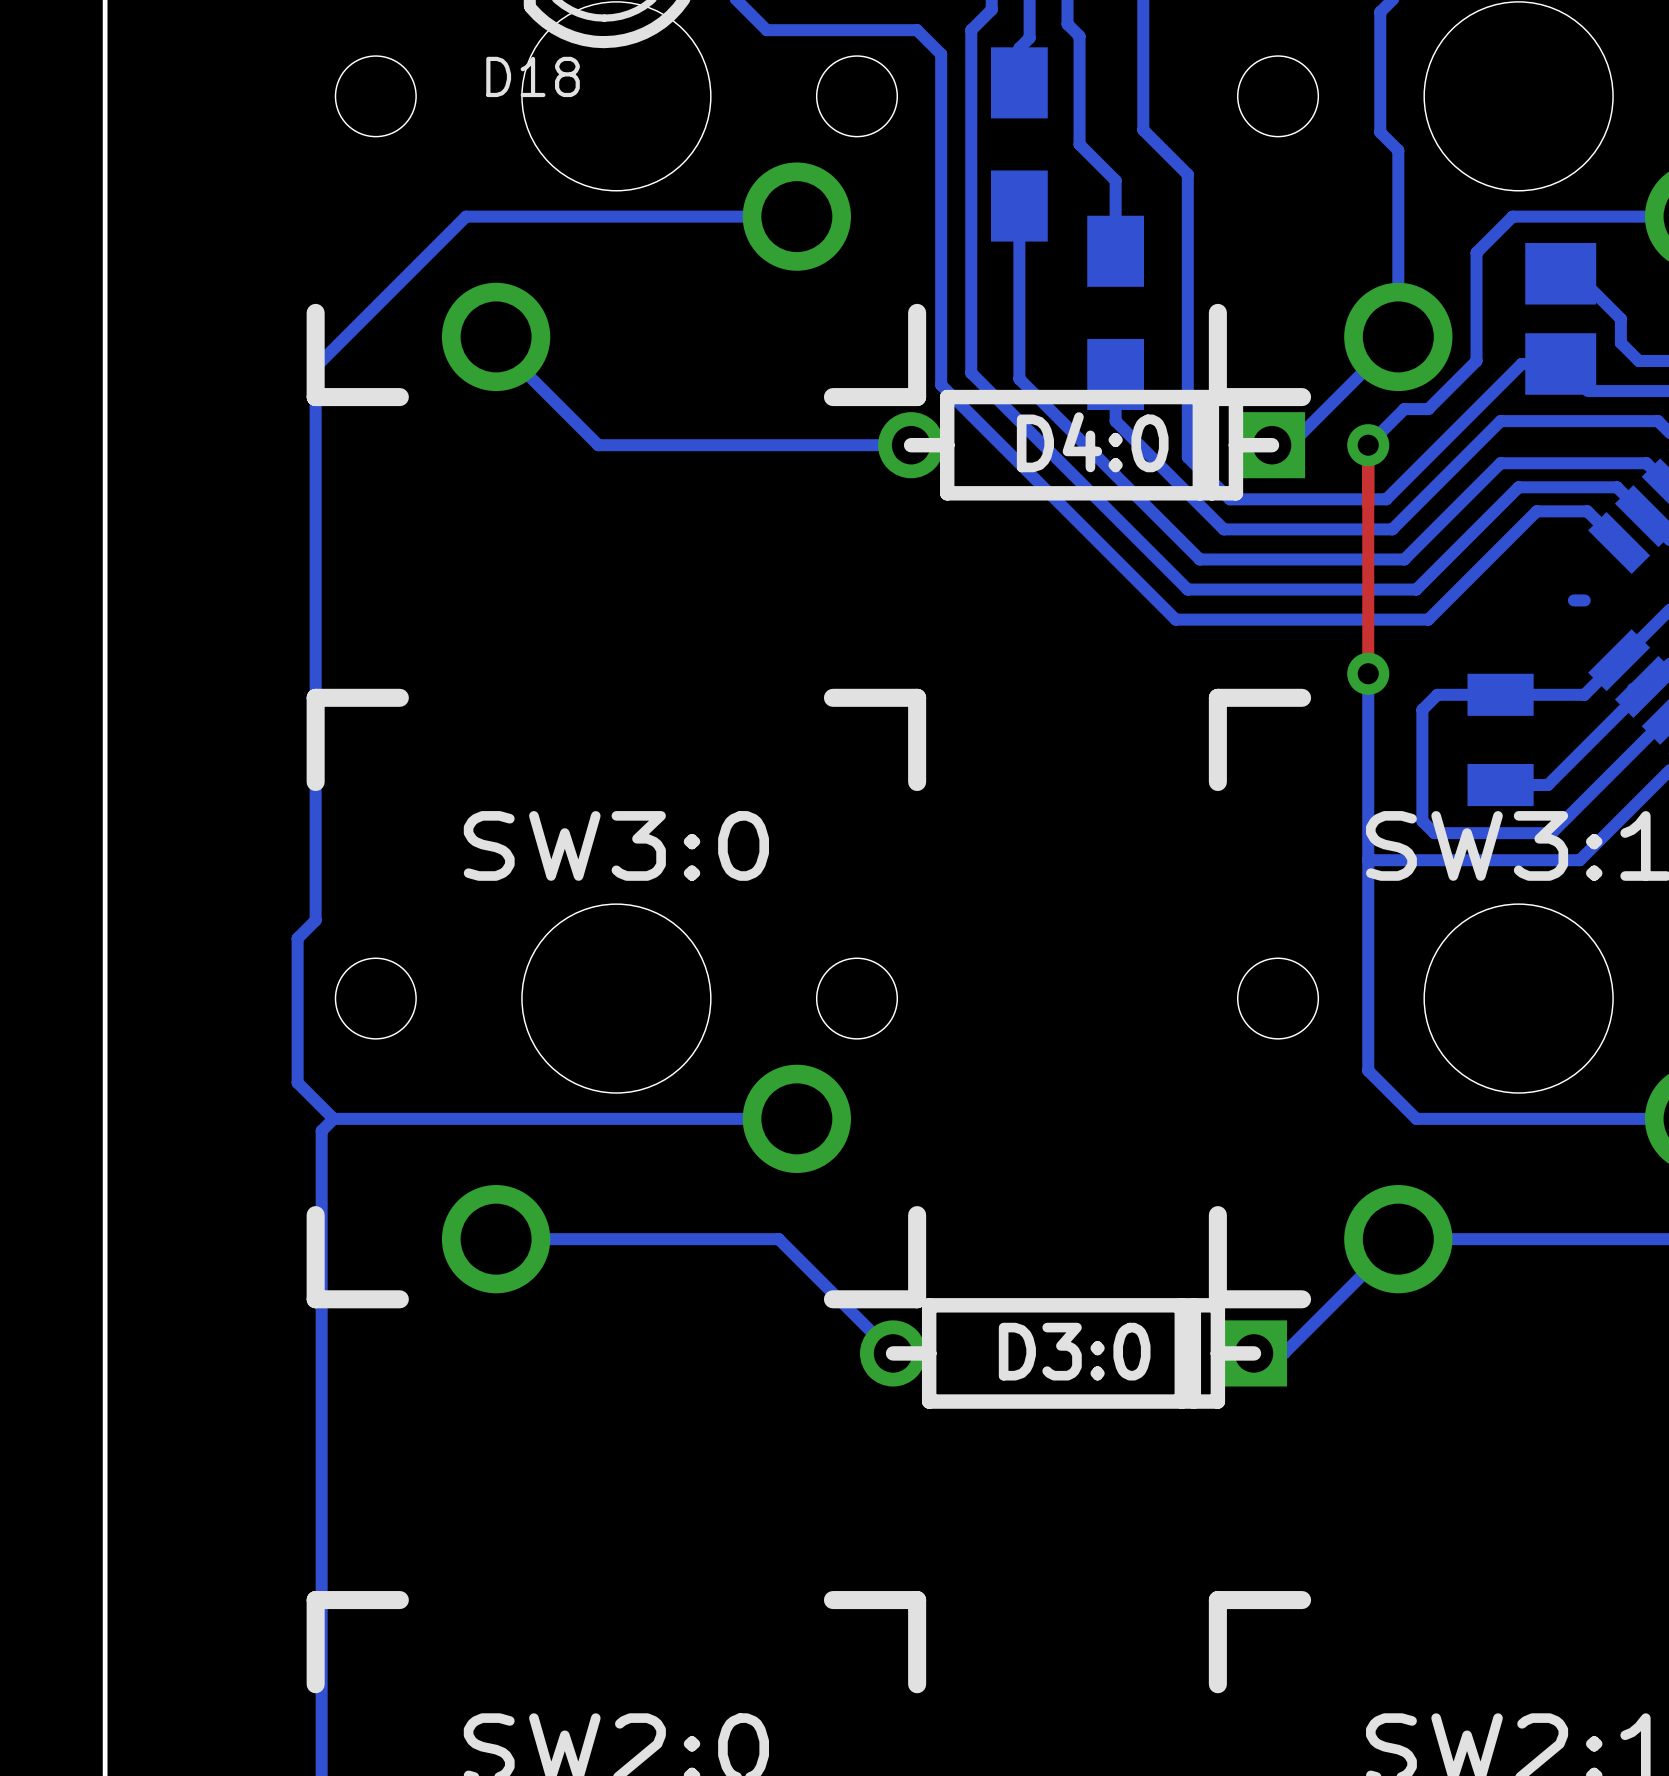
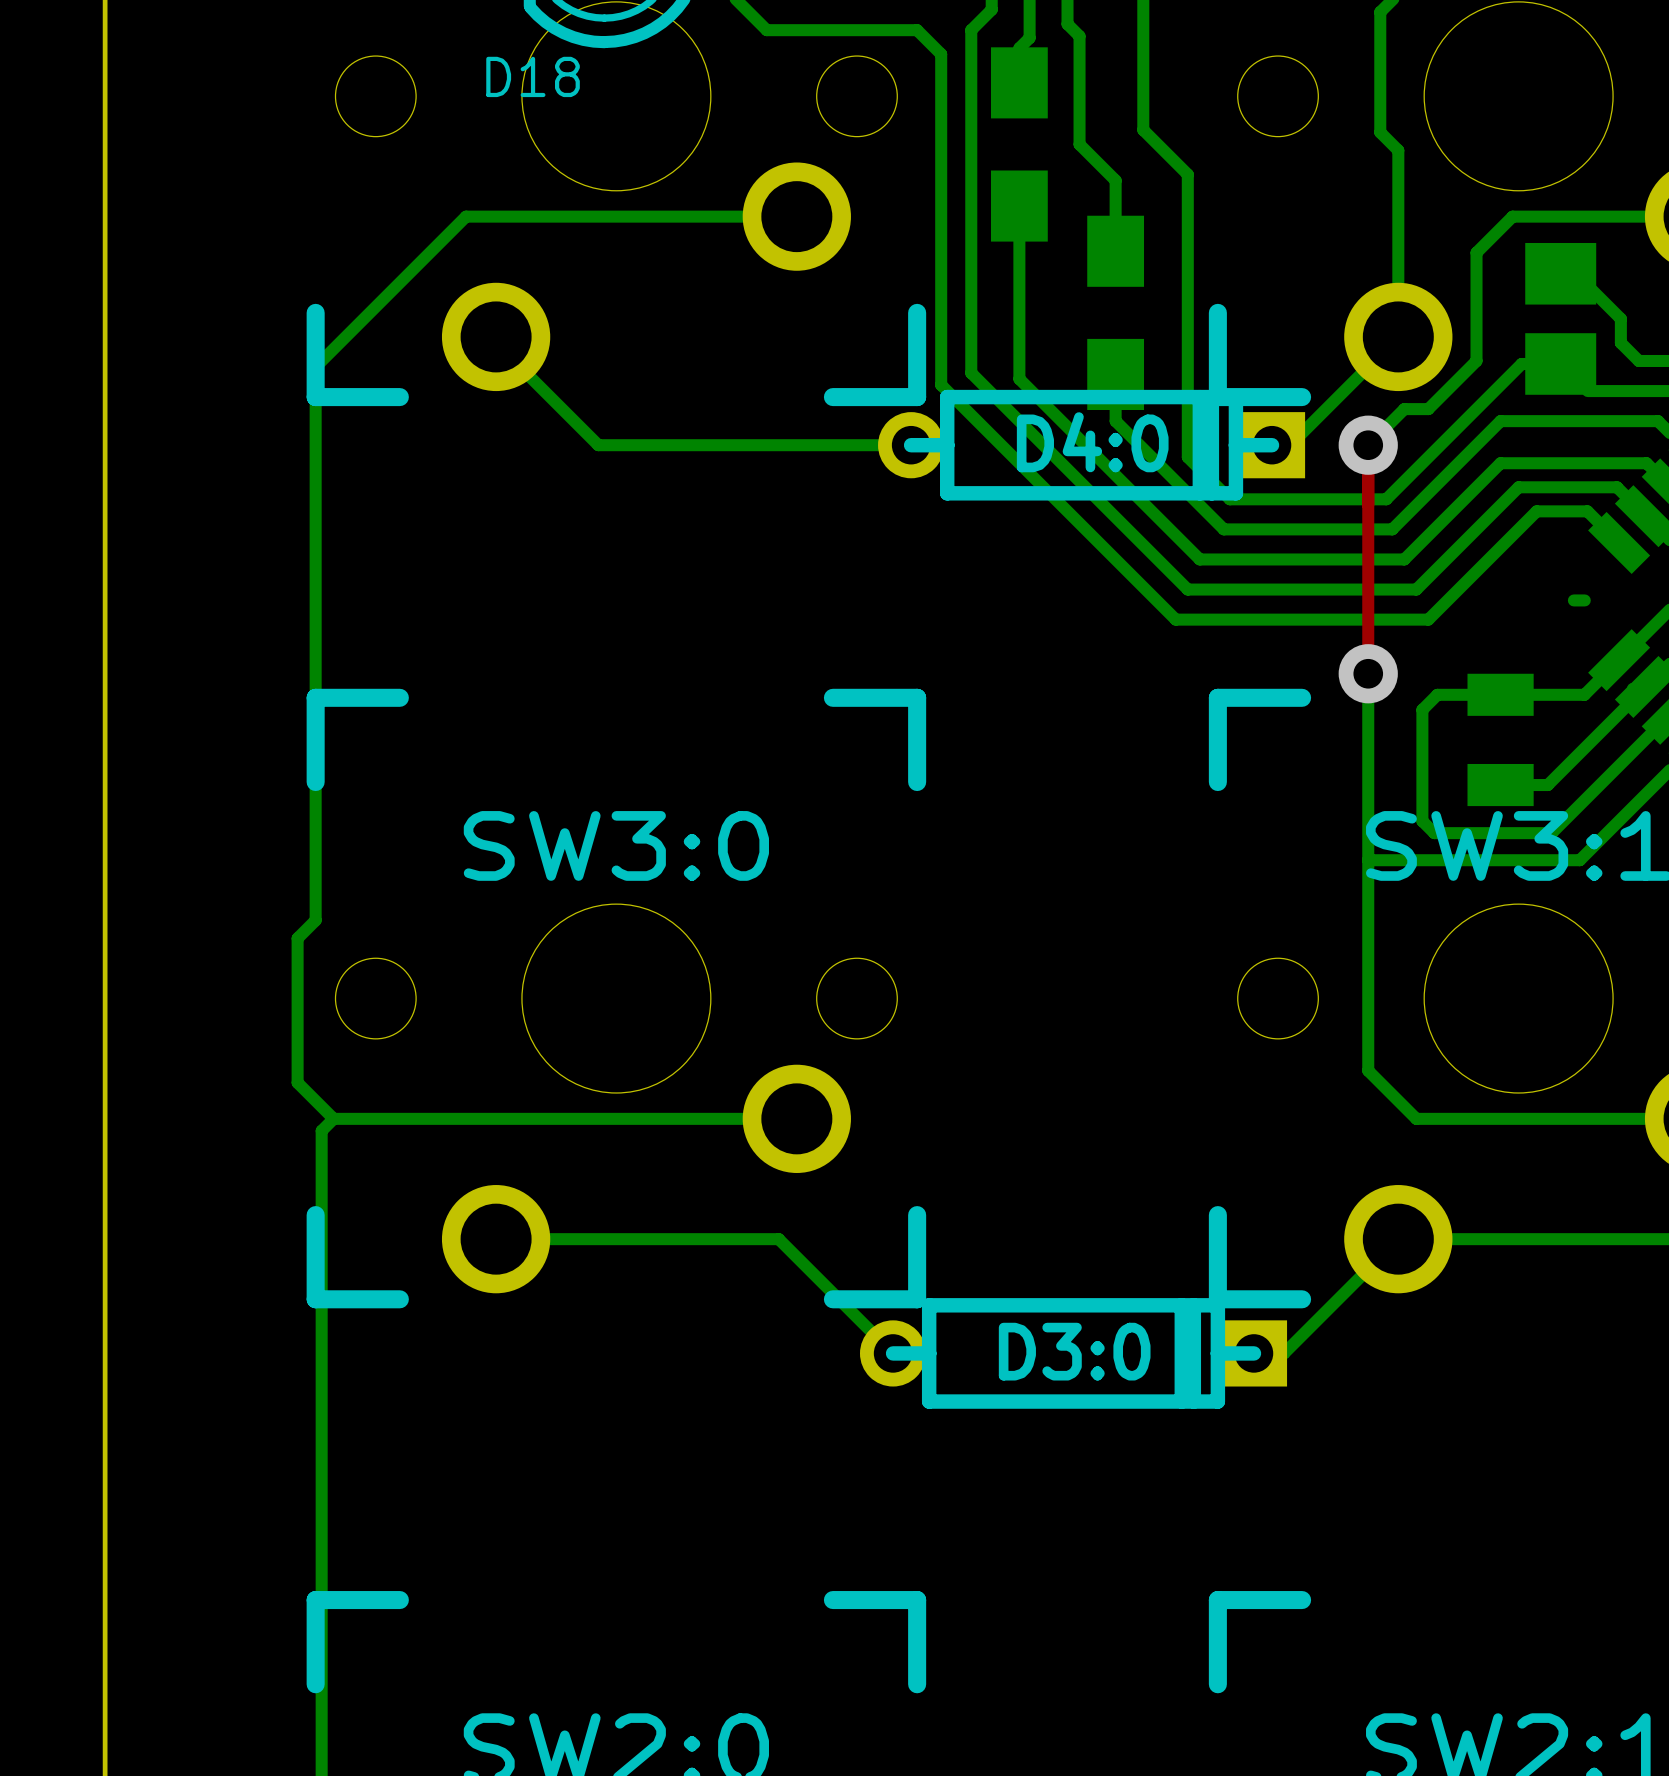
via size: [1347, 424, 1390, 467] -> [1338, 415, 1398, 475]
via size: [1347, 652, 1390, 695] -> [1338, 644, 1398, 704]

